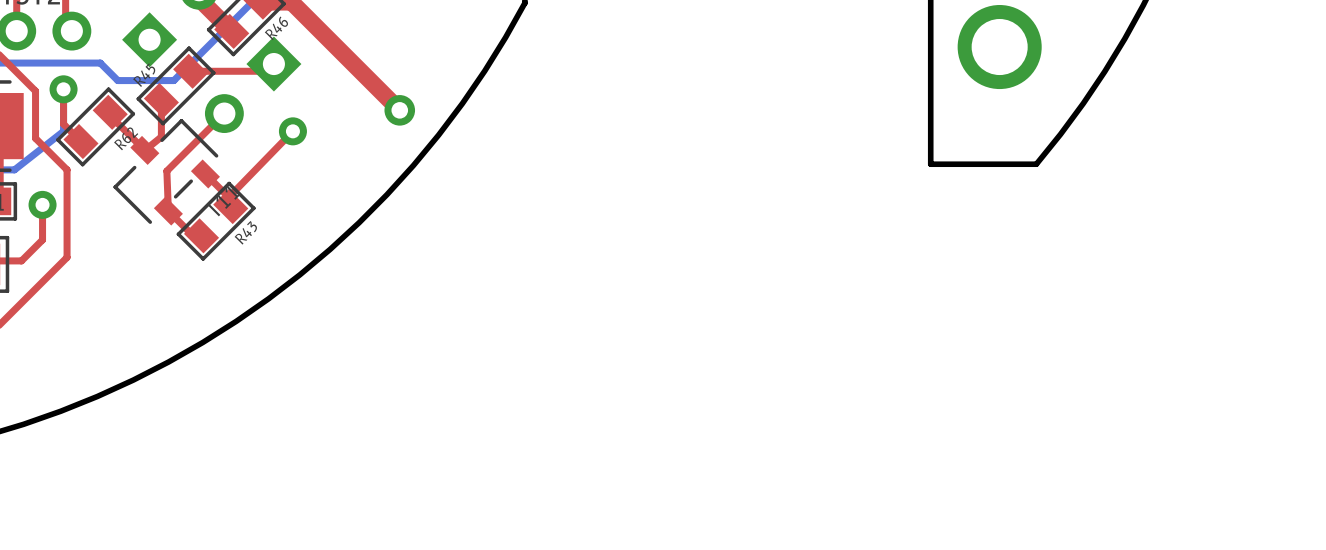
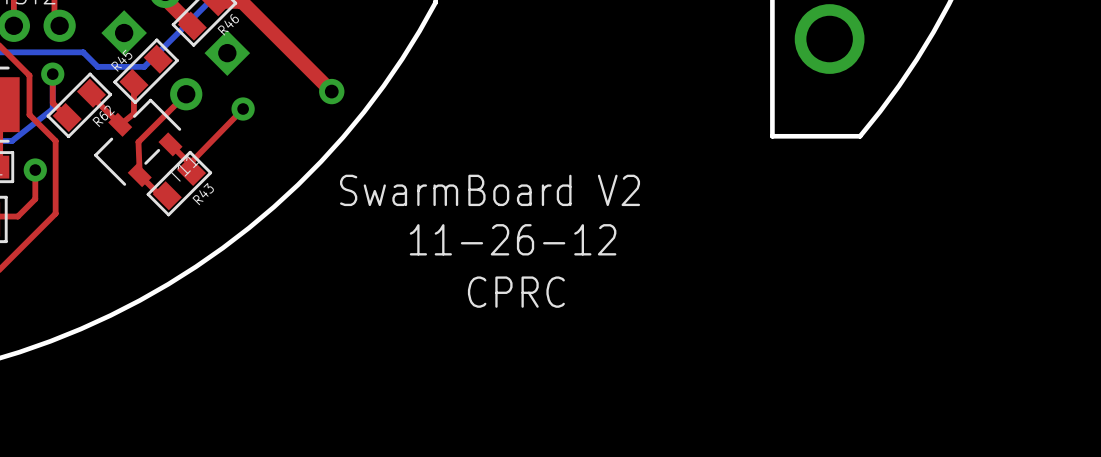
top track: (273, 64) (266, 71) (190, 71) -> none
text: none -> SwarmBoard V2 (490, 190)
text: none -> 11-26-12 (513, 239)
text: none -> CPRC (516, 292)

